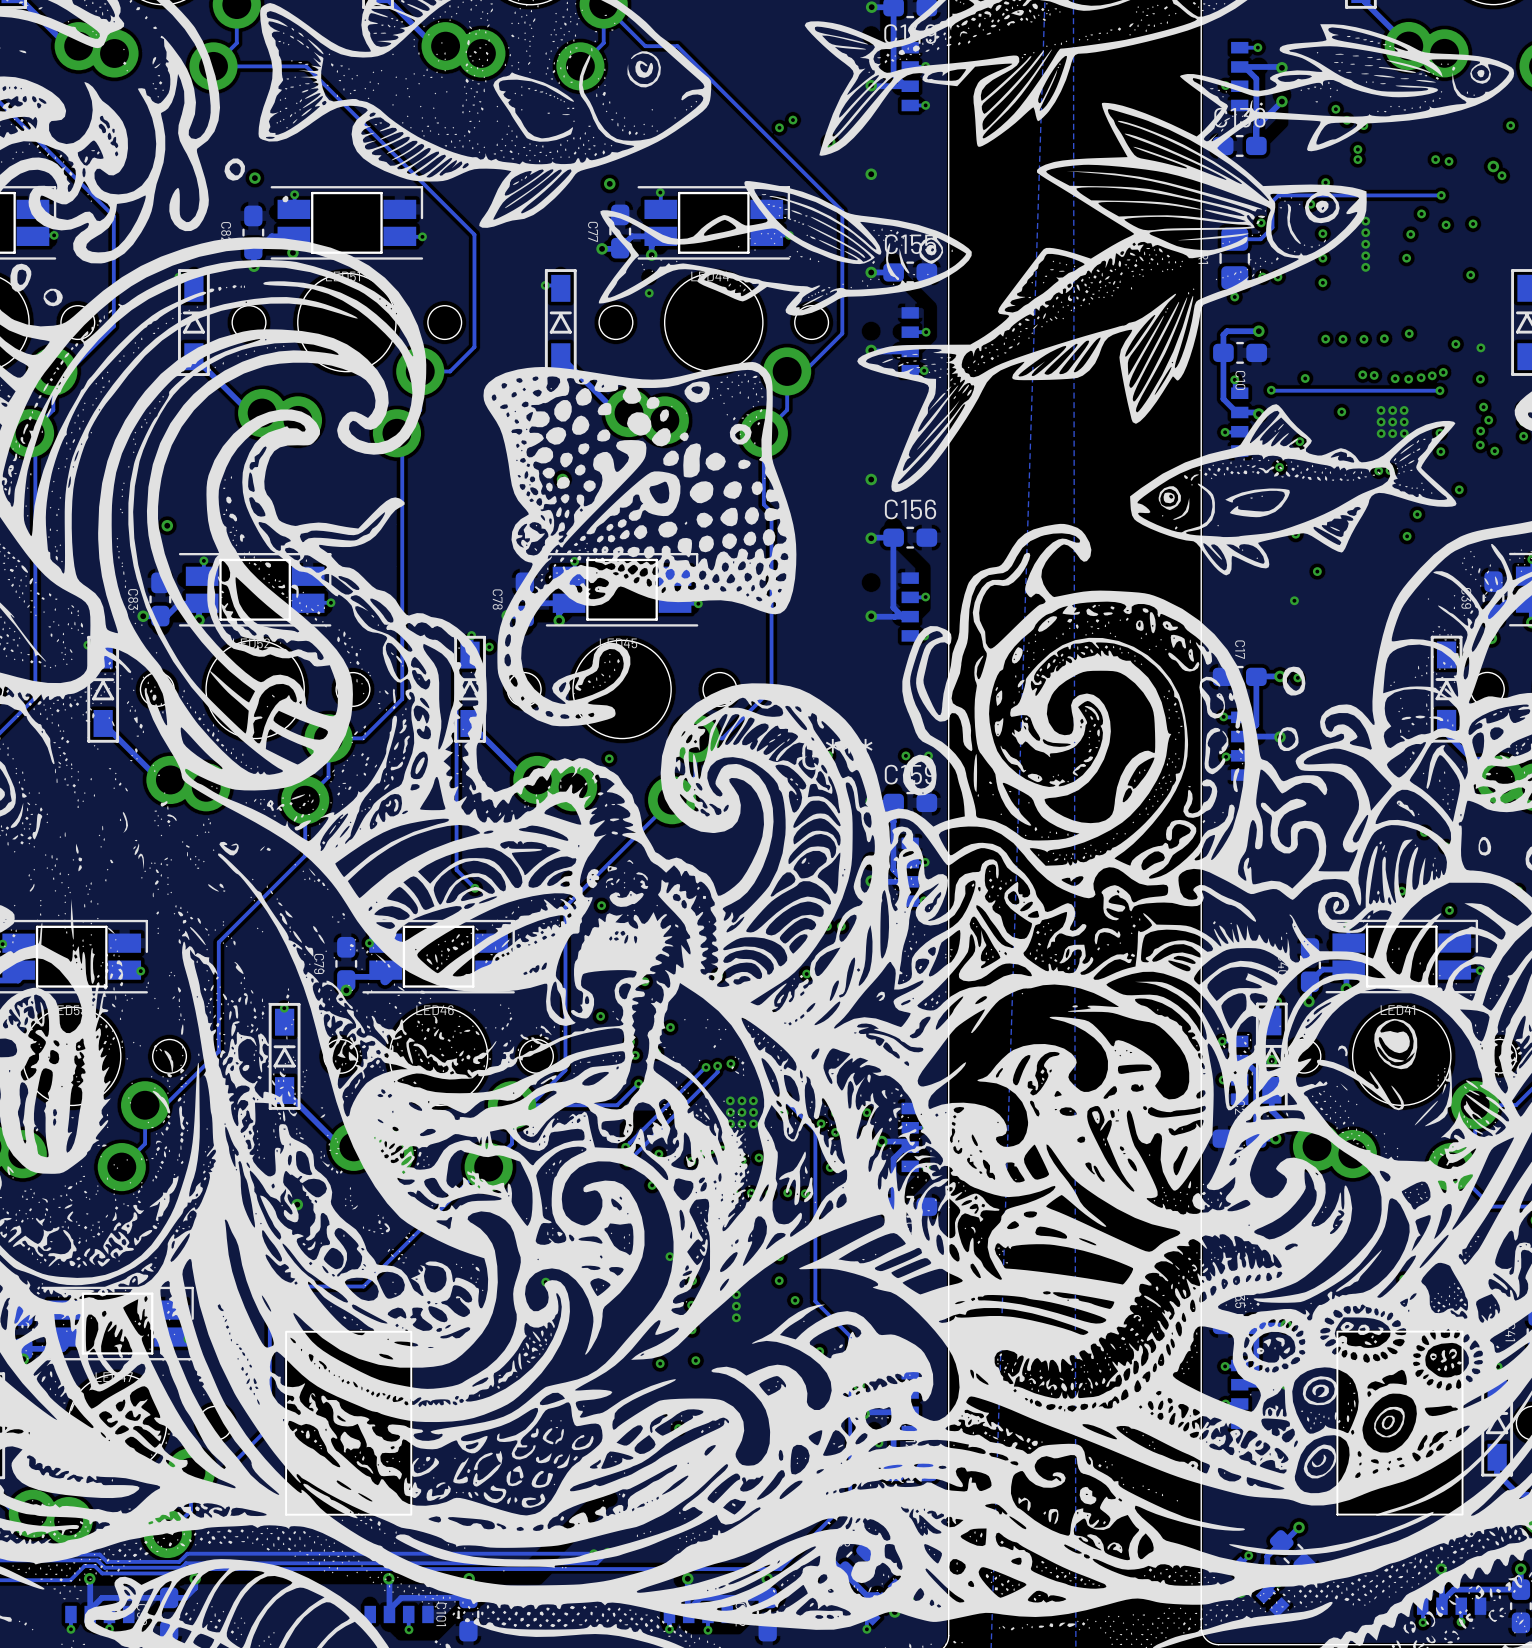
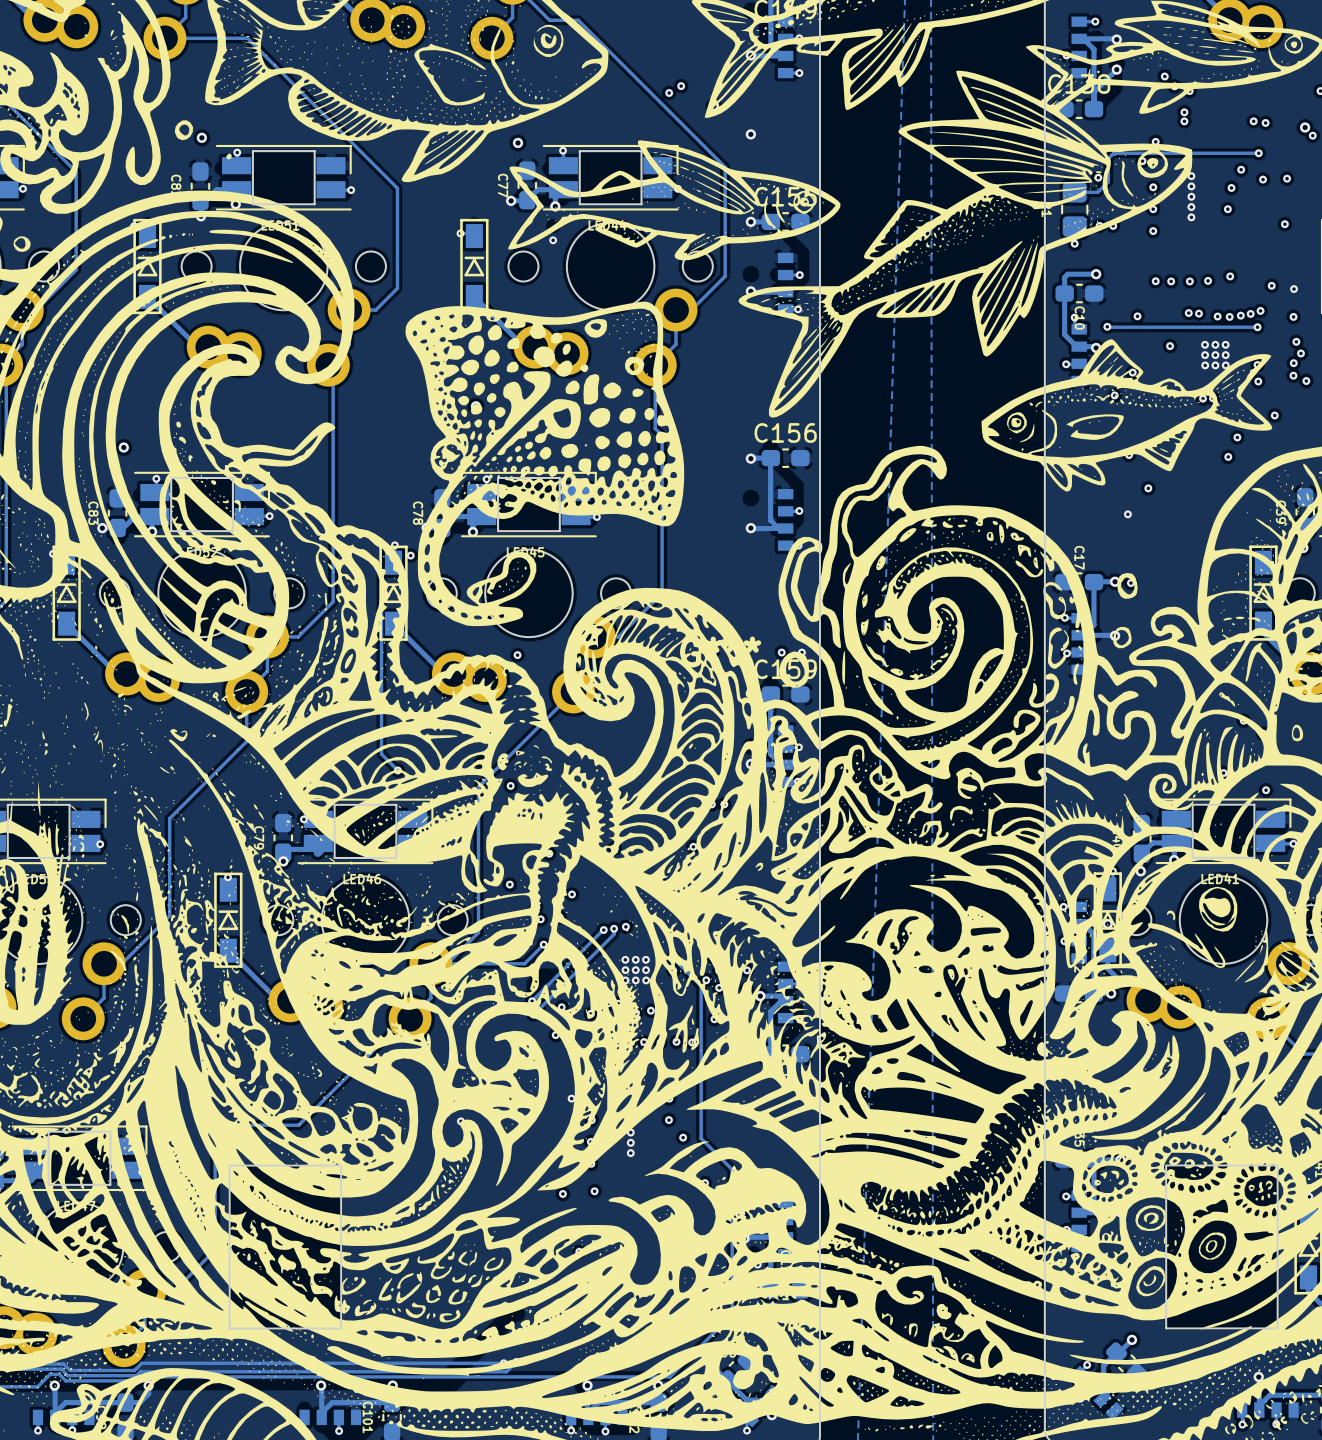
via: (871, 479) -> none
via: (297, 1204) -> none

